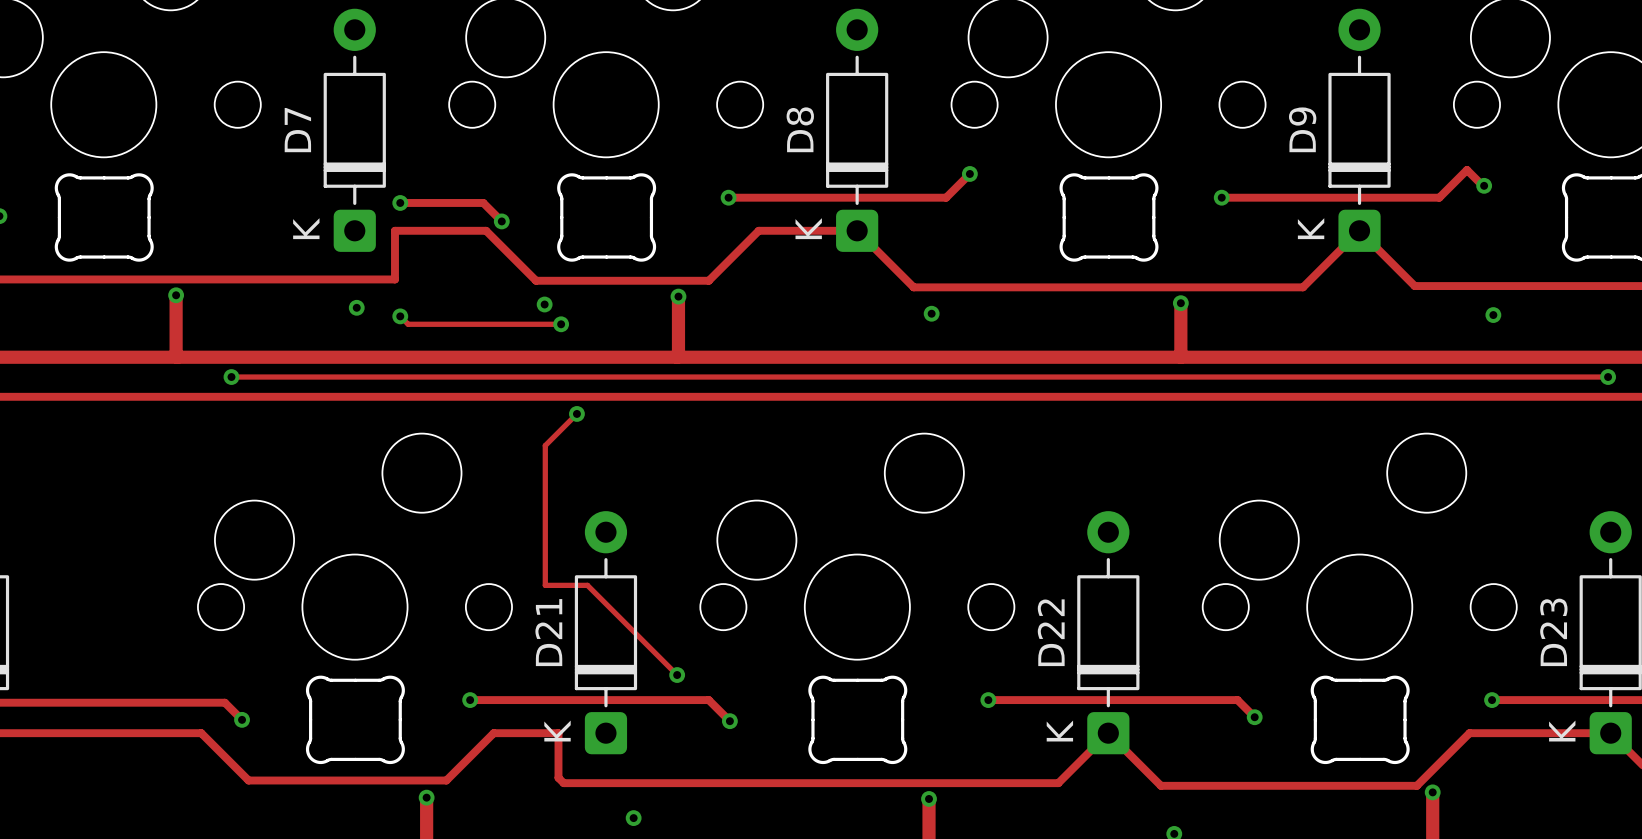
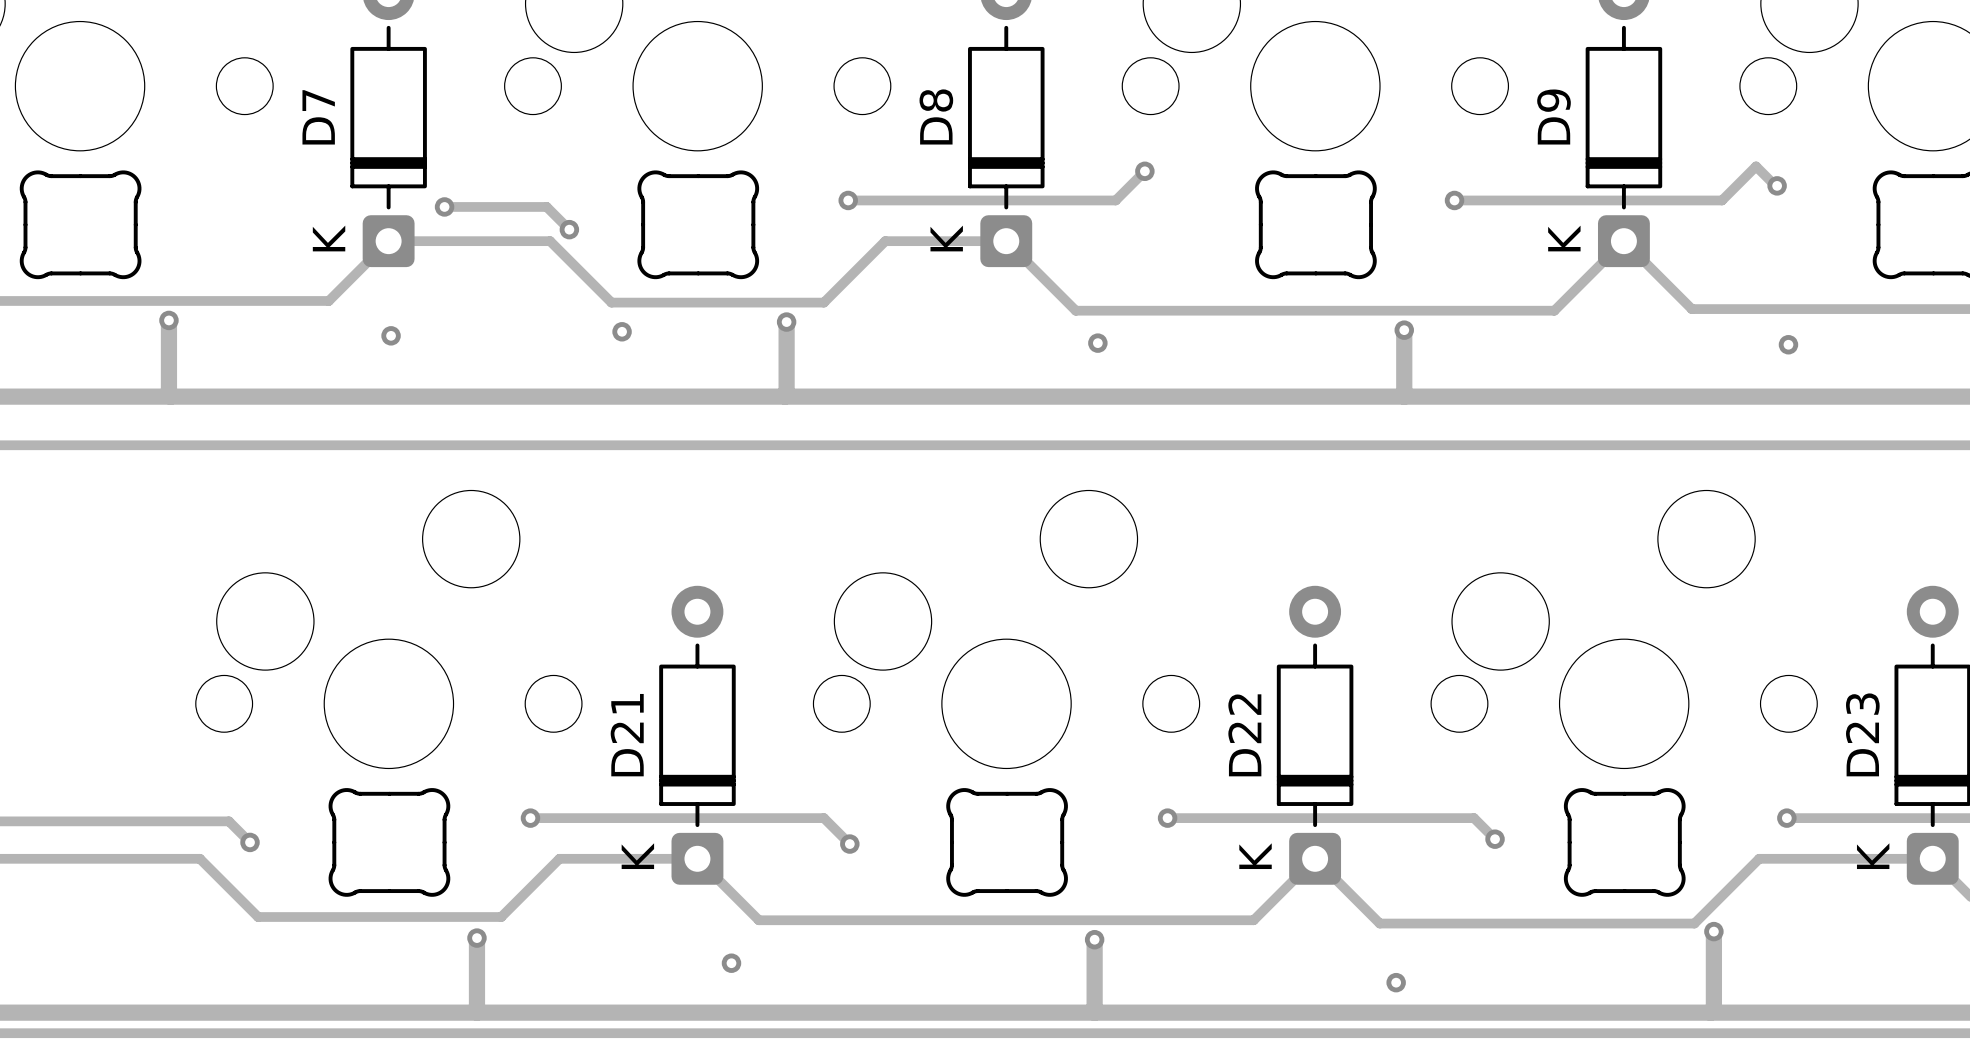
track: (394, 230) (394, 279) (306, 279) -> (438, 241) (388, 241) (328, 300)
track: (400, 316) (408, 324) (561, 324) -> none
via: (400, 316) -> none
via: (561, 324) -> none
track: (231, 377) (1608, 377) -> none
via: (231, 377) -> none
via: (1608, 377) -> none
track: (576, 413) (545, 445) (545, 585) (587, 585) (677, 675) -> none
via: (576, 413) -> none
via: (677, 675) -> none
track: (558, 733) (558, 777) (563, 783) (655, 783) -> (639, 858) (697, 858) (758, 920)

